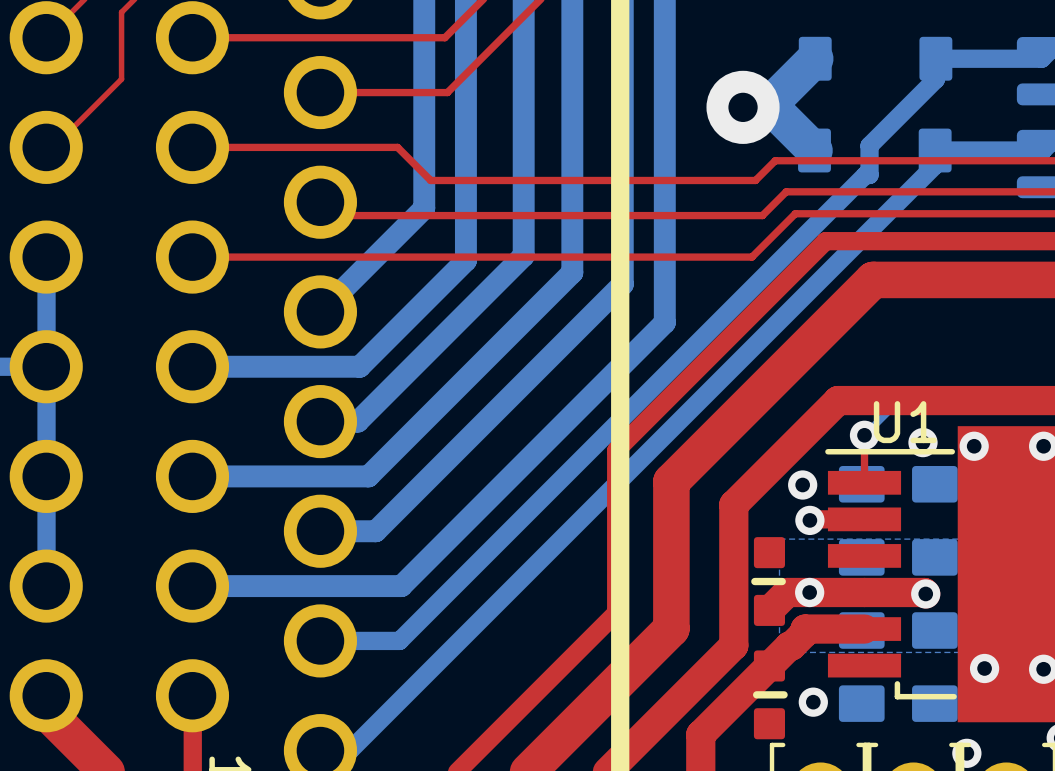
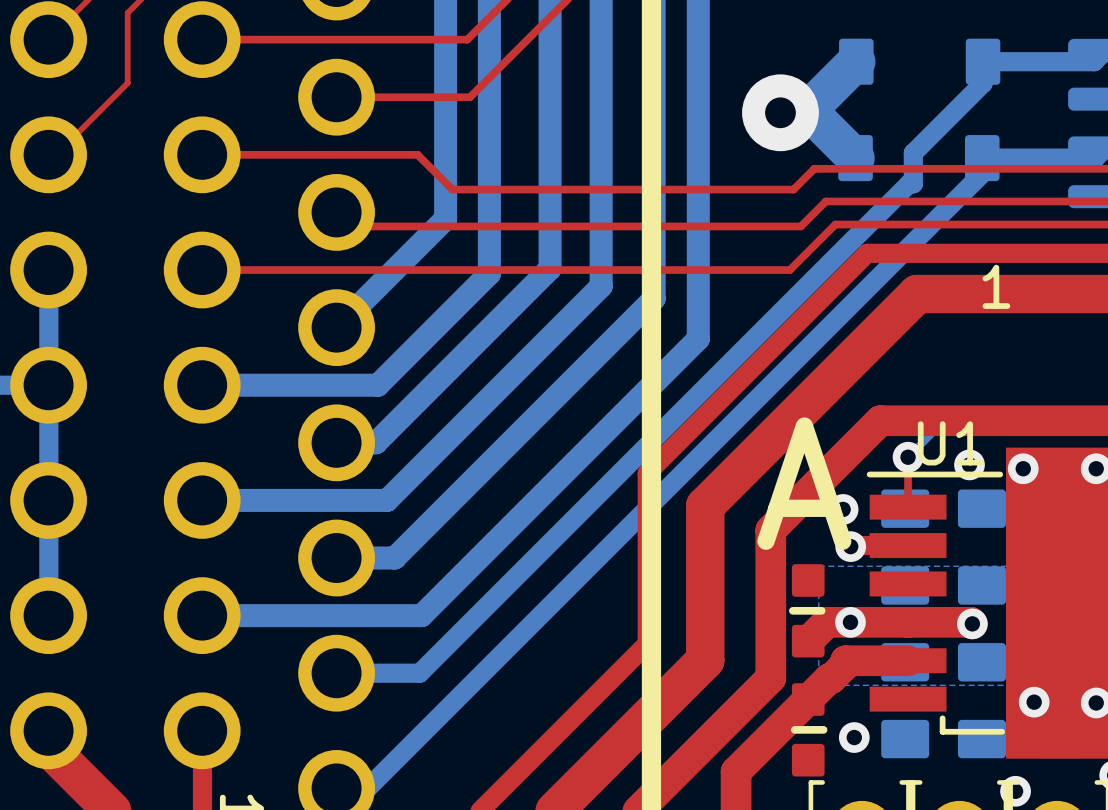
text: none -> 1 (996, 286)
text: none -> A (804, 483)

